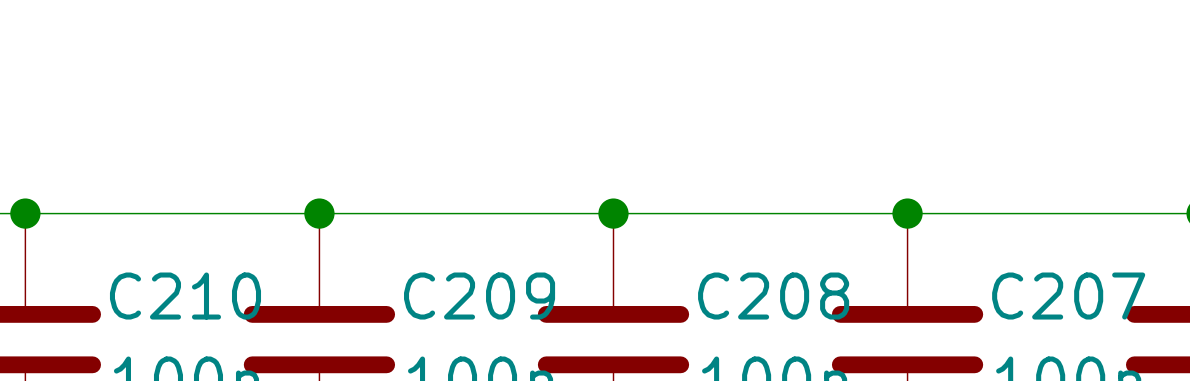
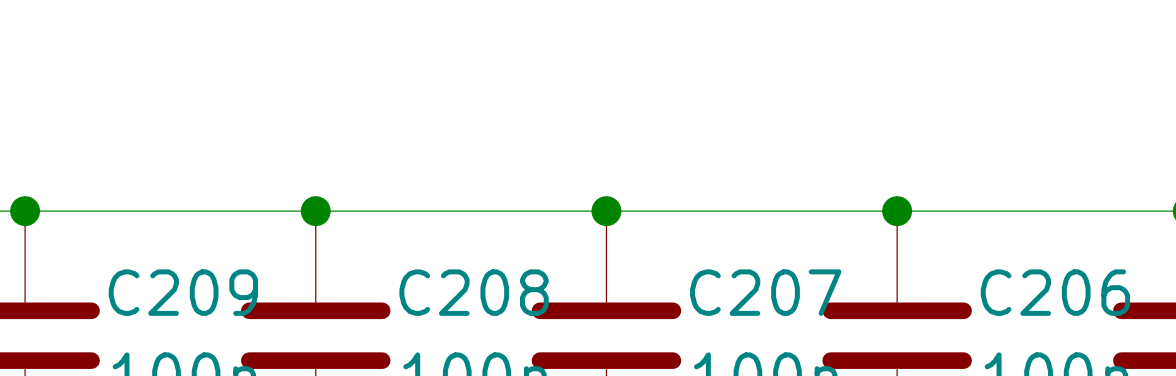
C210 name: C210 (185, 296) -> C209 (183, 292)
C209 name: C209 (479, 296) -> C208 (474, 292)
C208 name: C208 (773, 296) -> C207 (765, 292)
C207 name: C207 (1068, 296) -> C206 (1055, 292)

